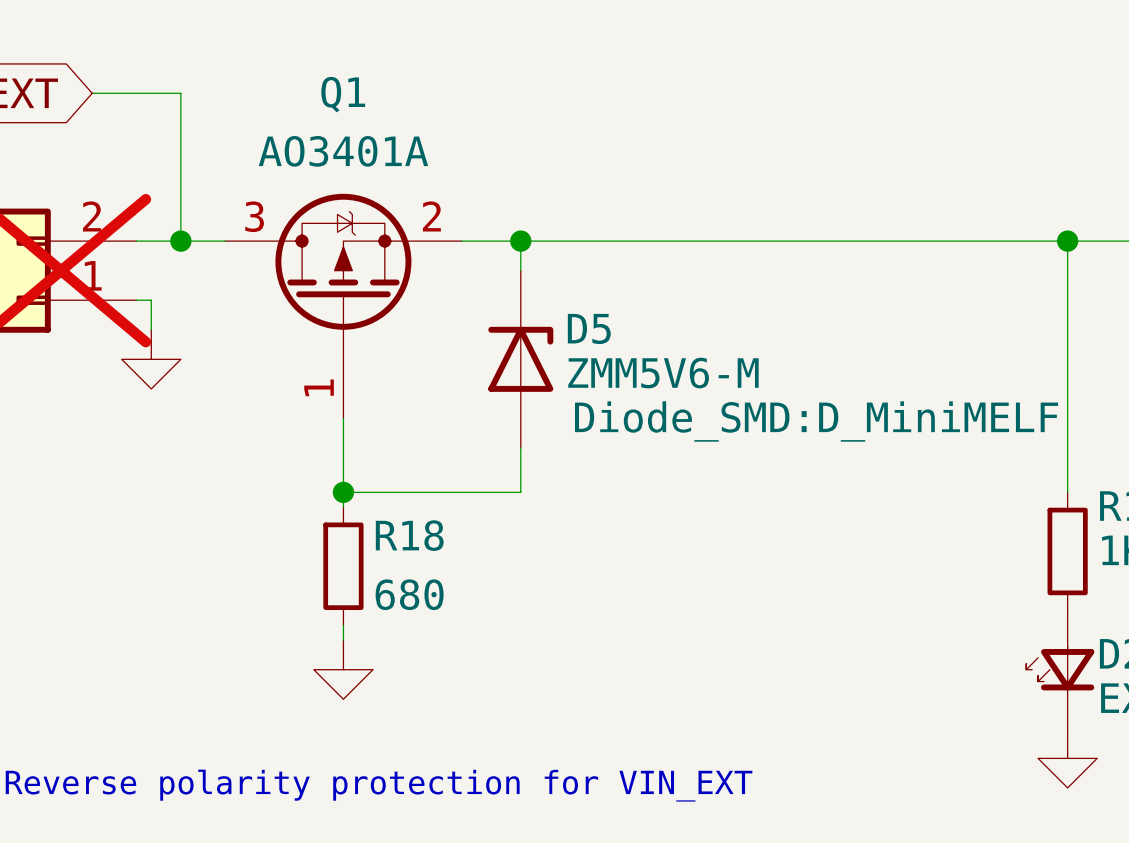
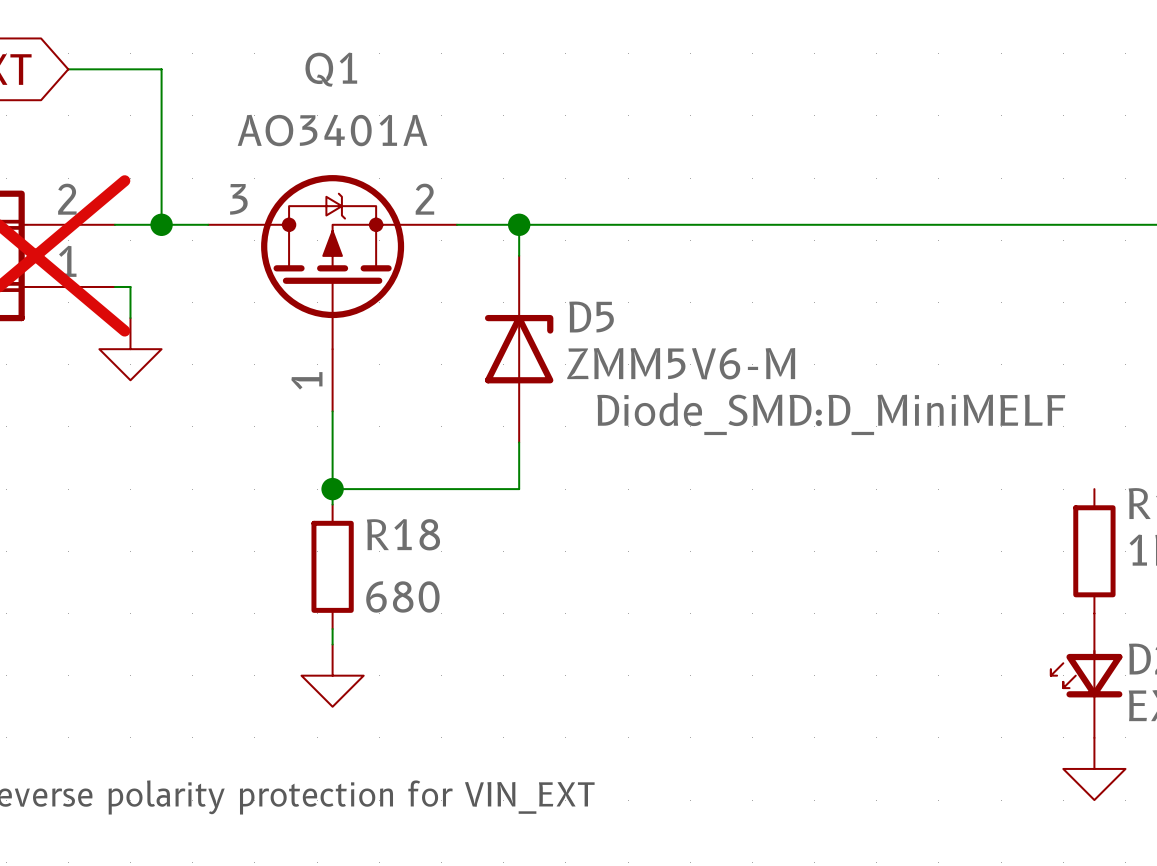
wire: (1067, 241) (1067, 492) -> none
junction: (1067, 241) -> none

